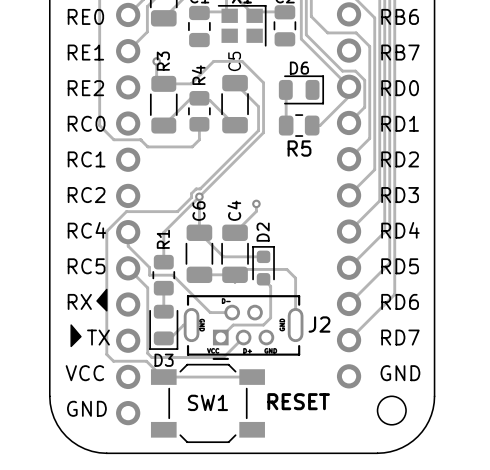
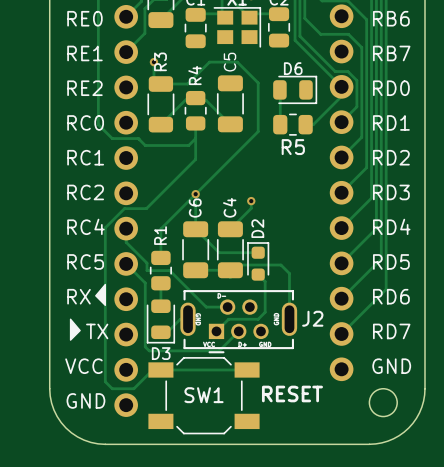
track: (235, 83) (258, 106) (258, 130) (200, 188) (196, 188) (191, 193) (191, 197) (177, 211) (148, 211) -> (195, 138) (195, 159) (146, 208)
track: (106, 354) (113, 361) (146, 361) (162, 377) -> (105, 347) (105, 381) (112, 388) (133, 388) (152, 369)

